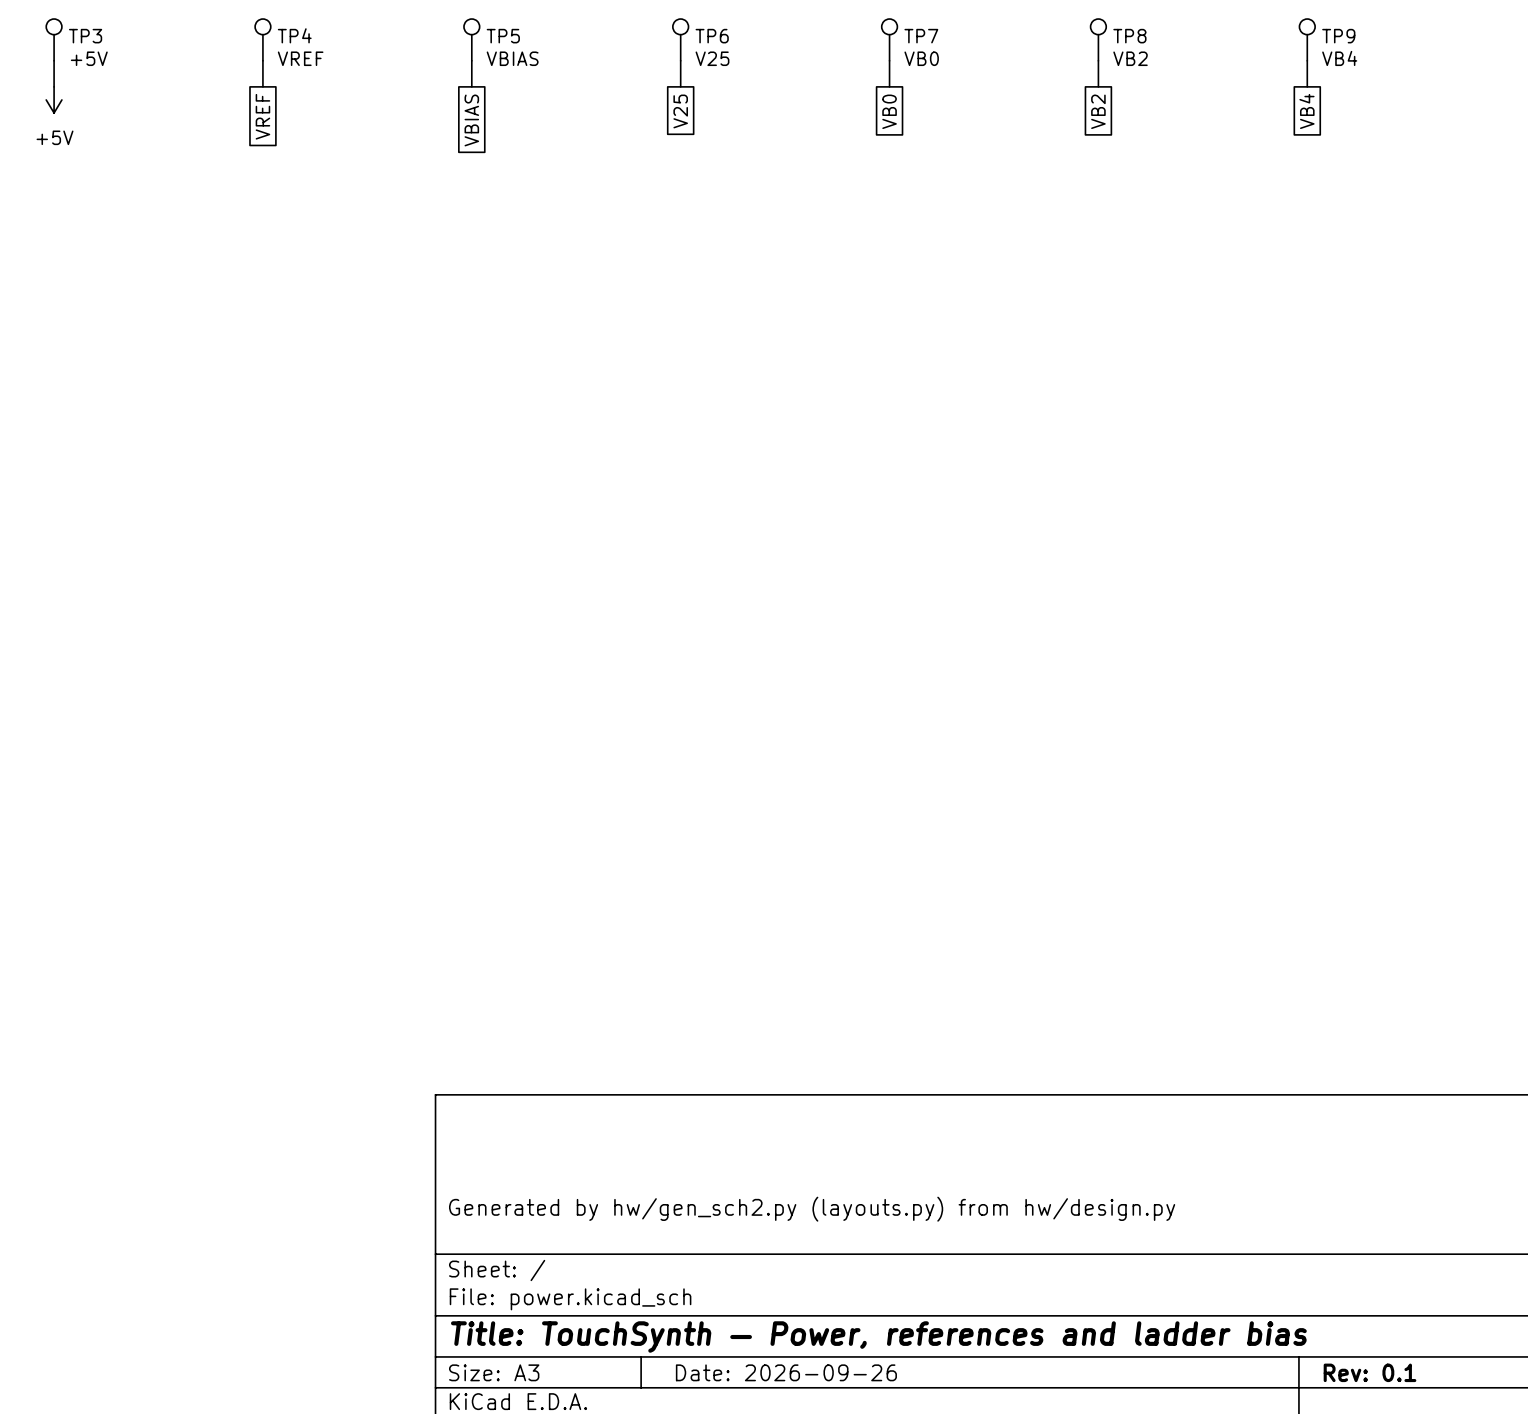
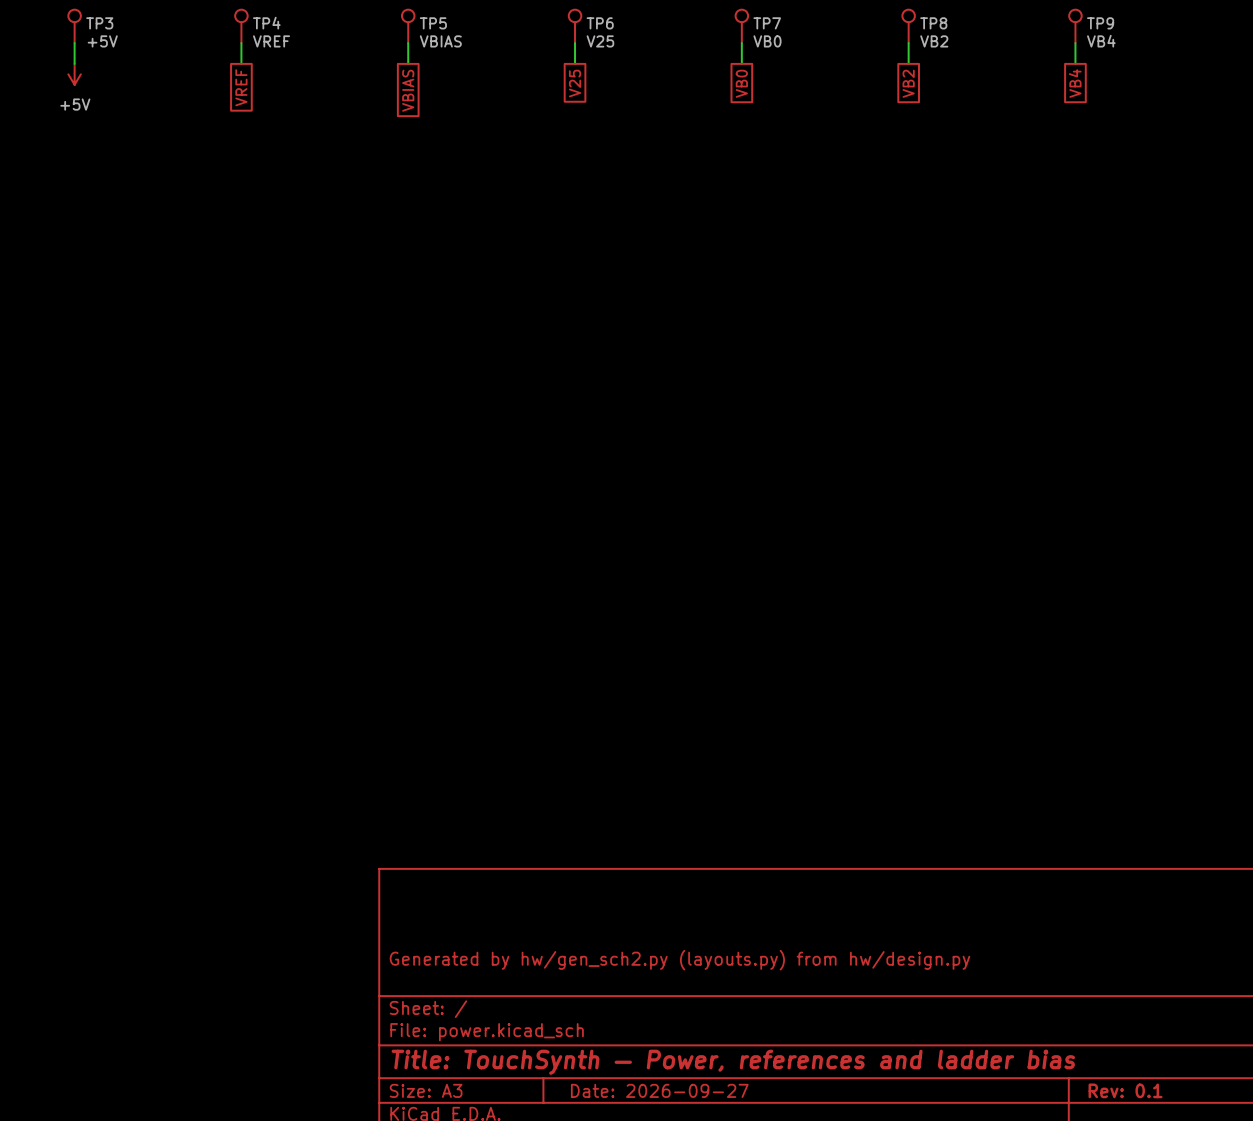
title block: Date: 2026-09-26 (786, 1372) -> Date: 2026-09-27 (659, 1090)

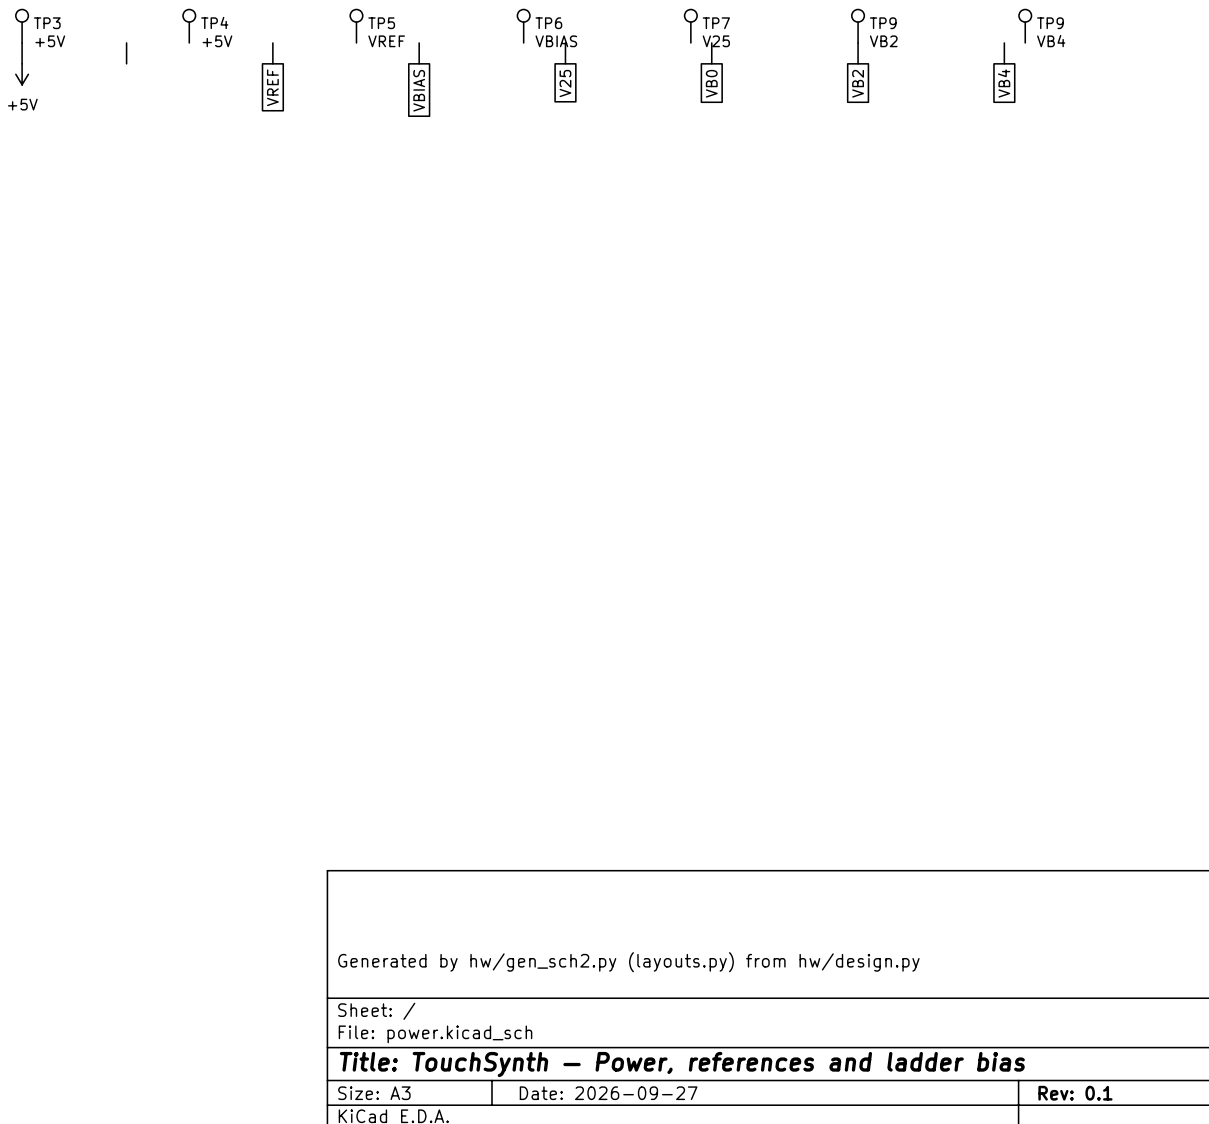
TP8 name: TP8 (933, 23) -> TP9 (883, 23)
TP4 value: VREF (271, 41) -> +5V (217, 41)
TP5 value: VBIAS (440, 41) -> VREF (386, 41)
TP6 value: V25 (600, 41) -> VBIAS (556, 41)
TP7 value: VB0 (767, 41) -> V25 (716, 41)
wire: (241, 43) (241, 63) -> (126, 42) (126, 63)
wire: none -> (272, 42) (272, 63)
wire: (408, 43) (408, 63) -> (419, 42) (419, 63)
wire: (575, 43) (575, 63) -> (565, 42) (565, 63)
wire: (741, 43) (741, 63) -> (711, 42) (711, 63)
wire: (1075, 43) (1075, 63) -> (1004, 42) (1004, 63)
global label position: V25 (575, 83) -> V25 (565, 83)
global label position: VB0 (741, 83) -> VB0 (711, 83)
global label position: VB4 (1075, 83) -> VB4 (1004, 83)
global label position: VREF (241, 87) -> VREF (272, 87)
global label position: VBIAS (408, 90) -> VBIAS (419, 90)

